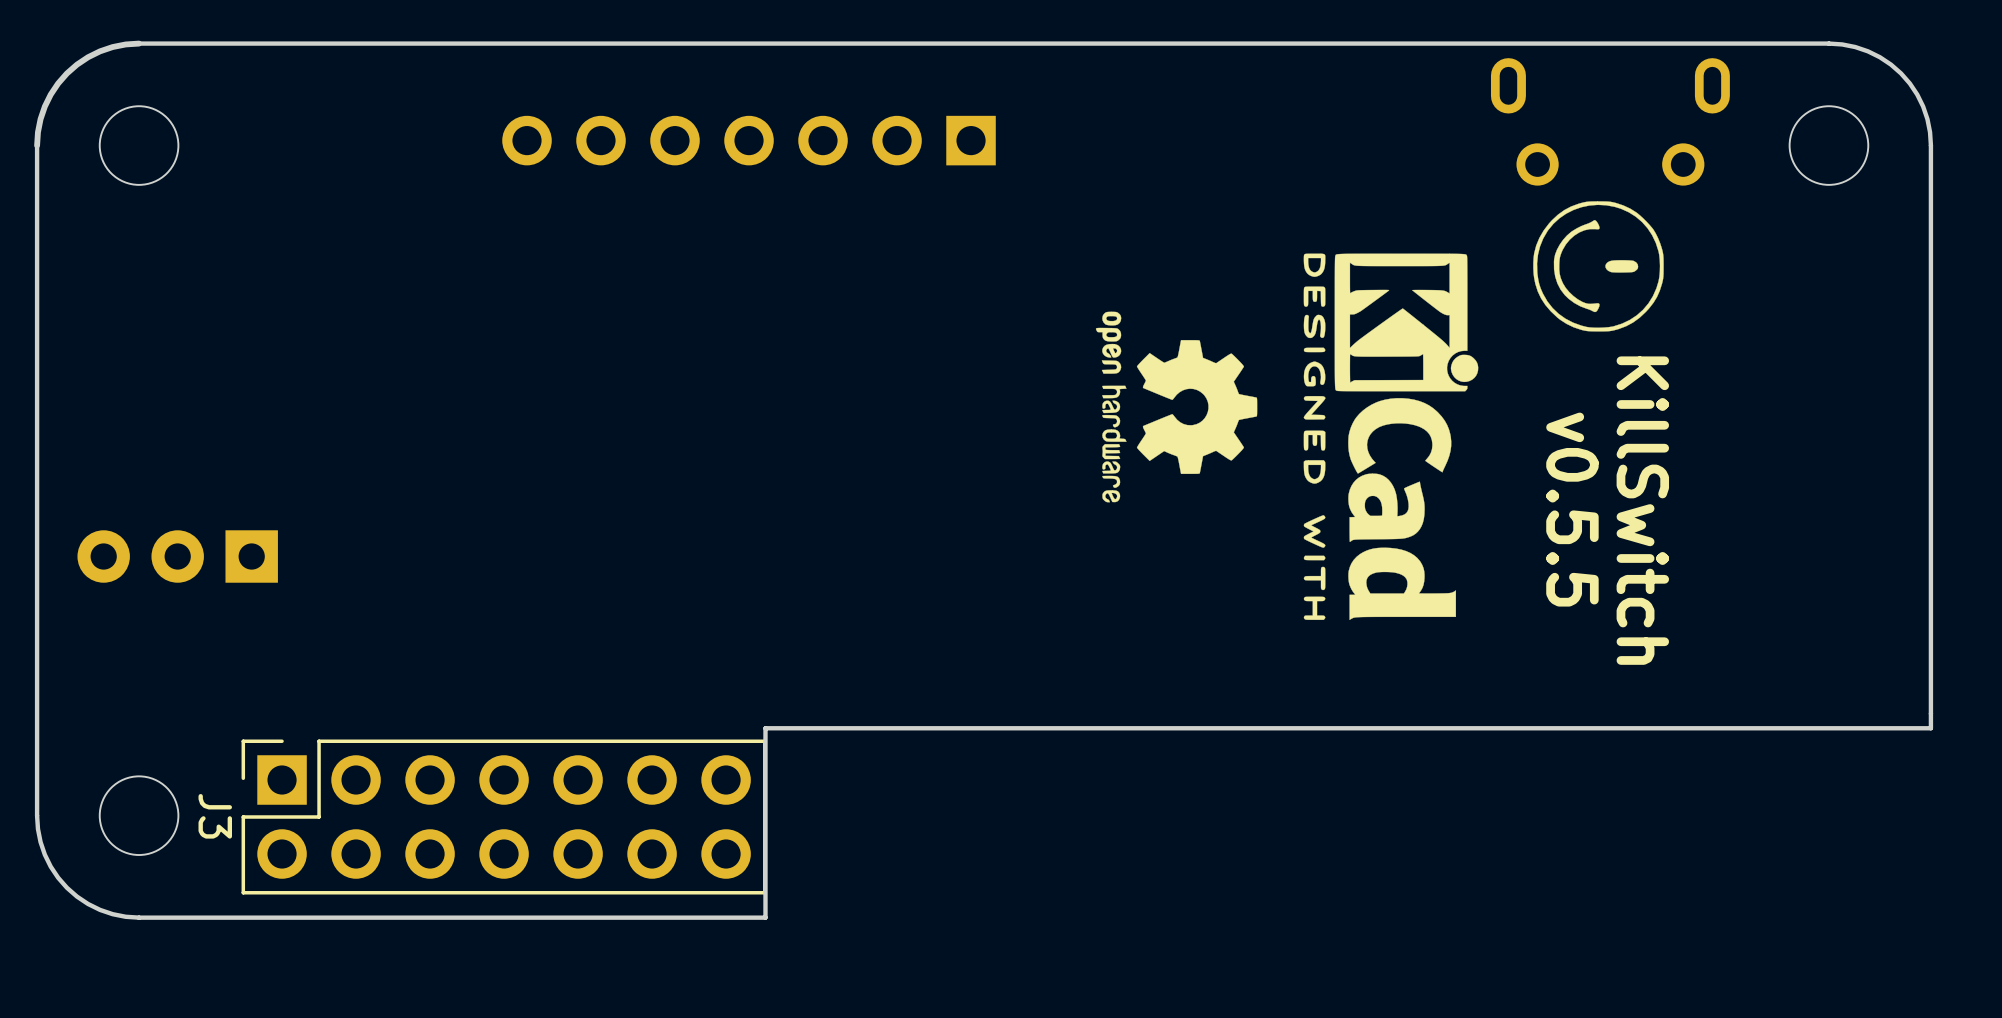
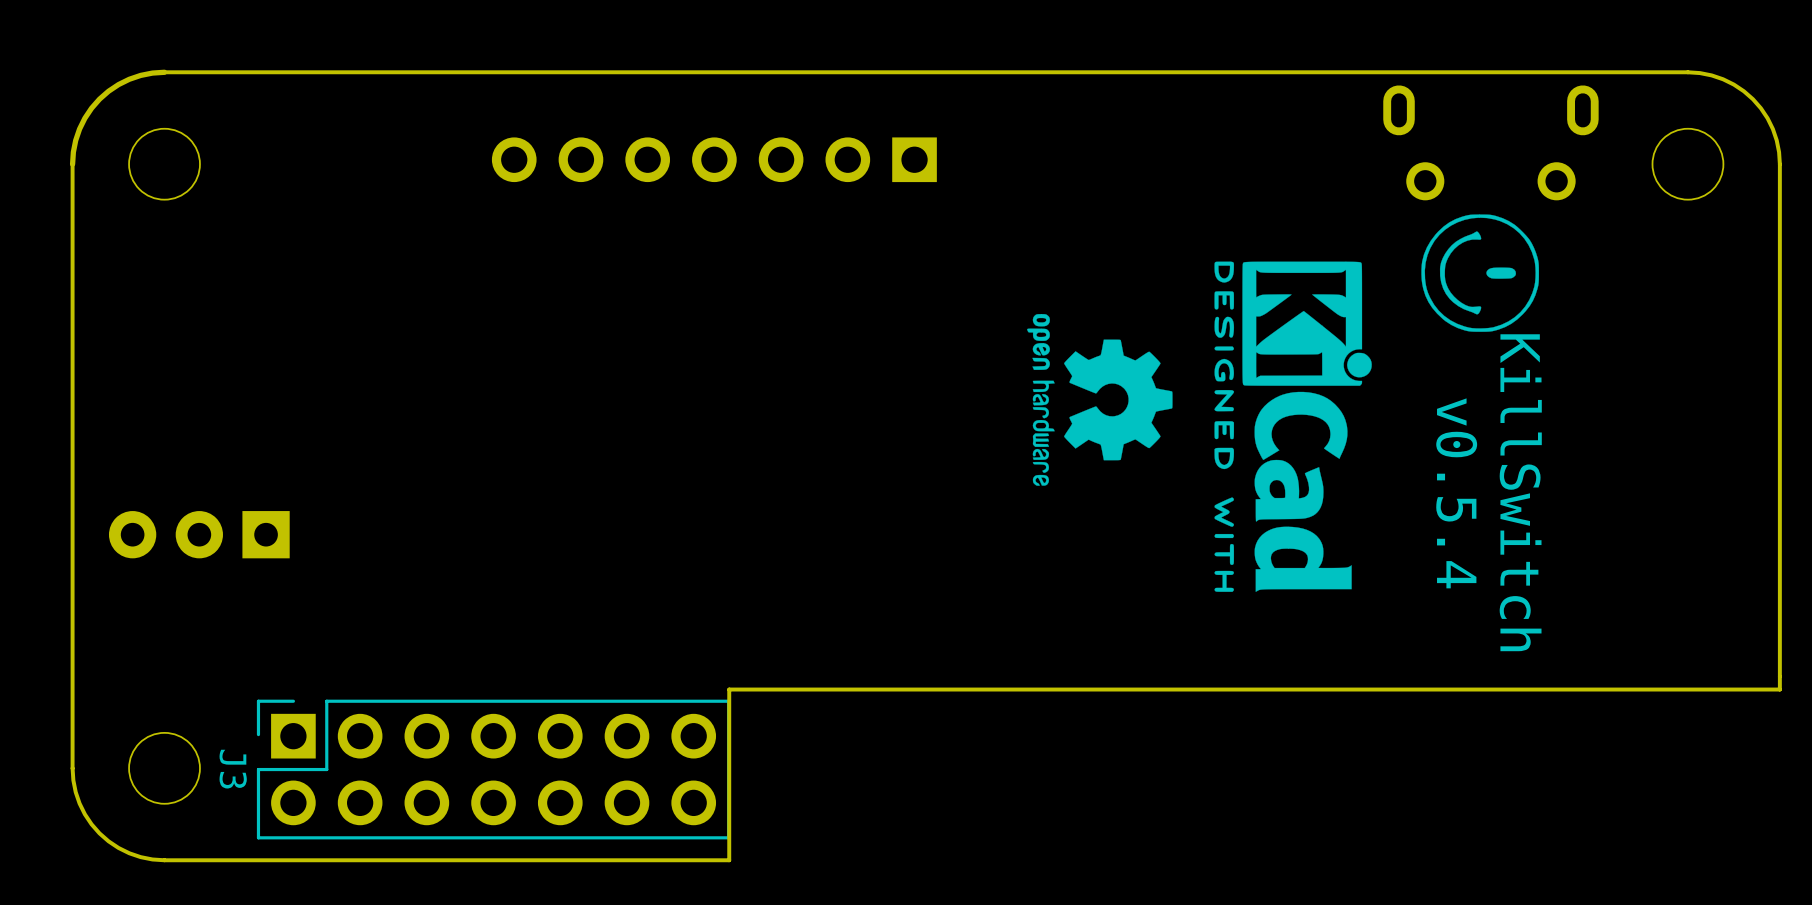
text: v0.5.5 (1572, 509) -> v0.5.4 (1456, 493)

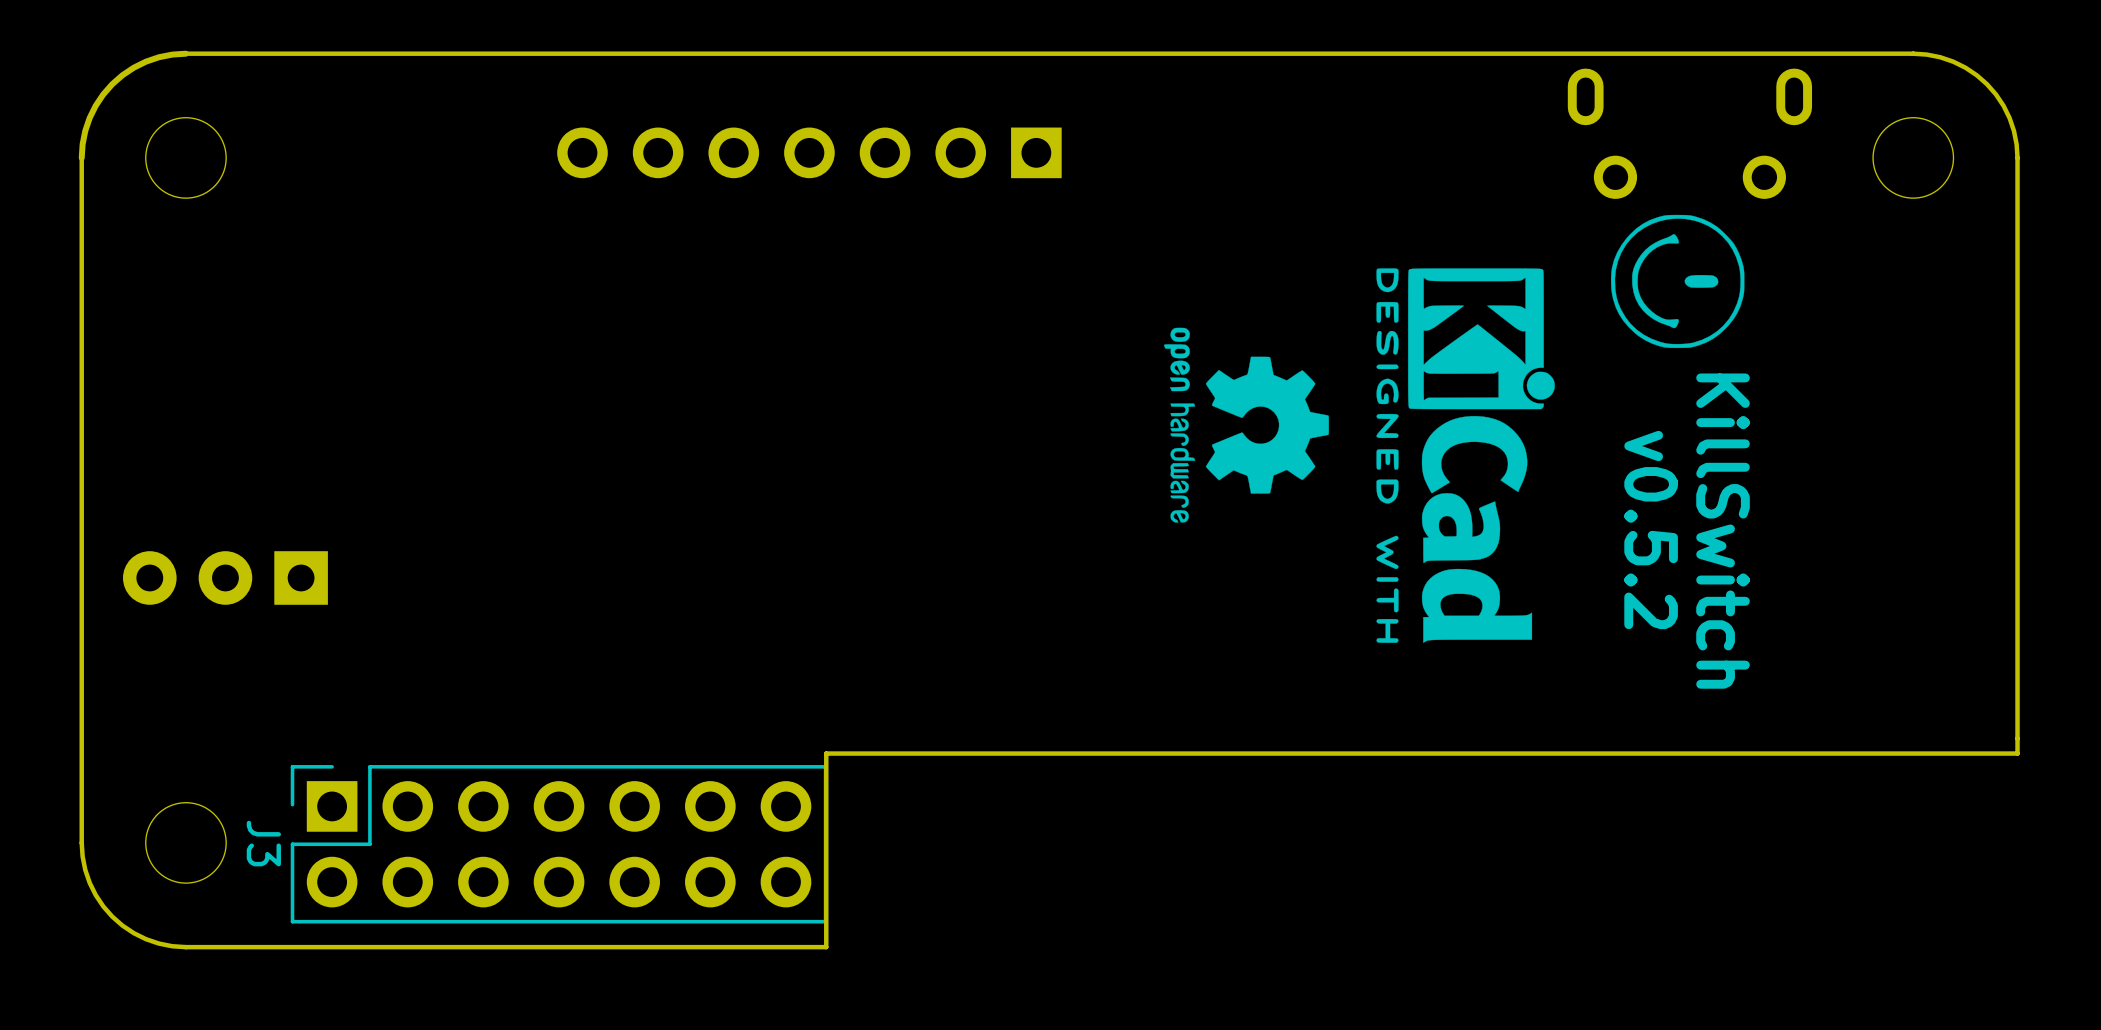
text: v0.5.4 (1456, 493) -> v0.5.2 (1651, 530)

